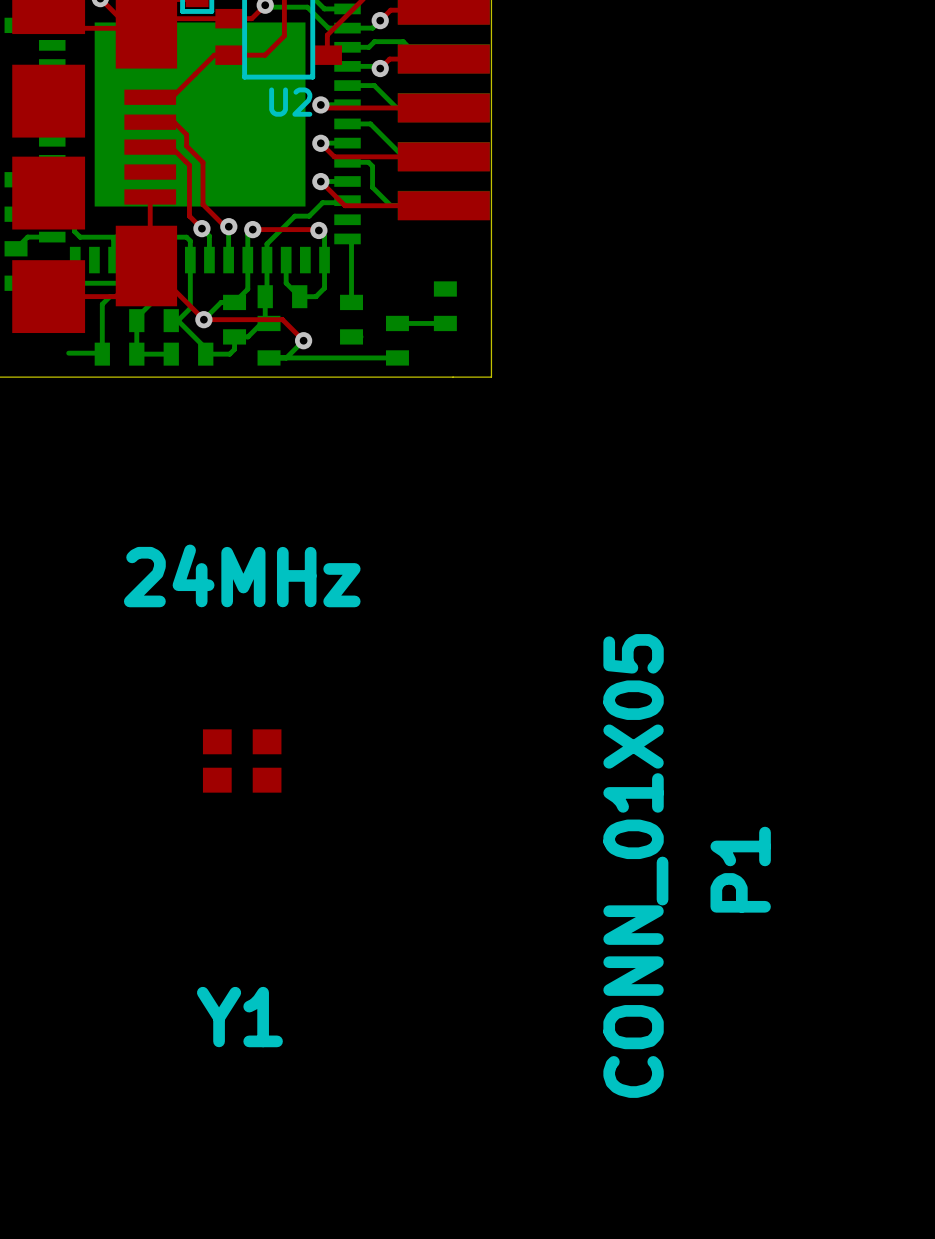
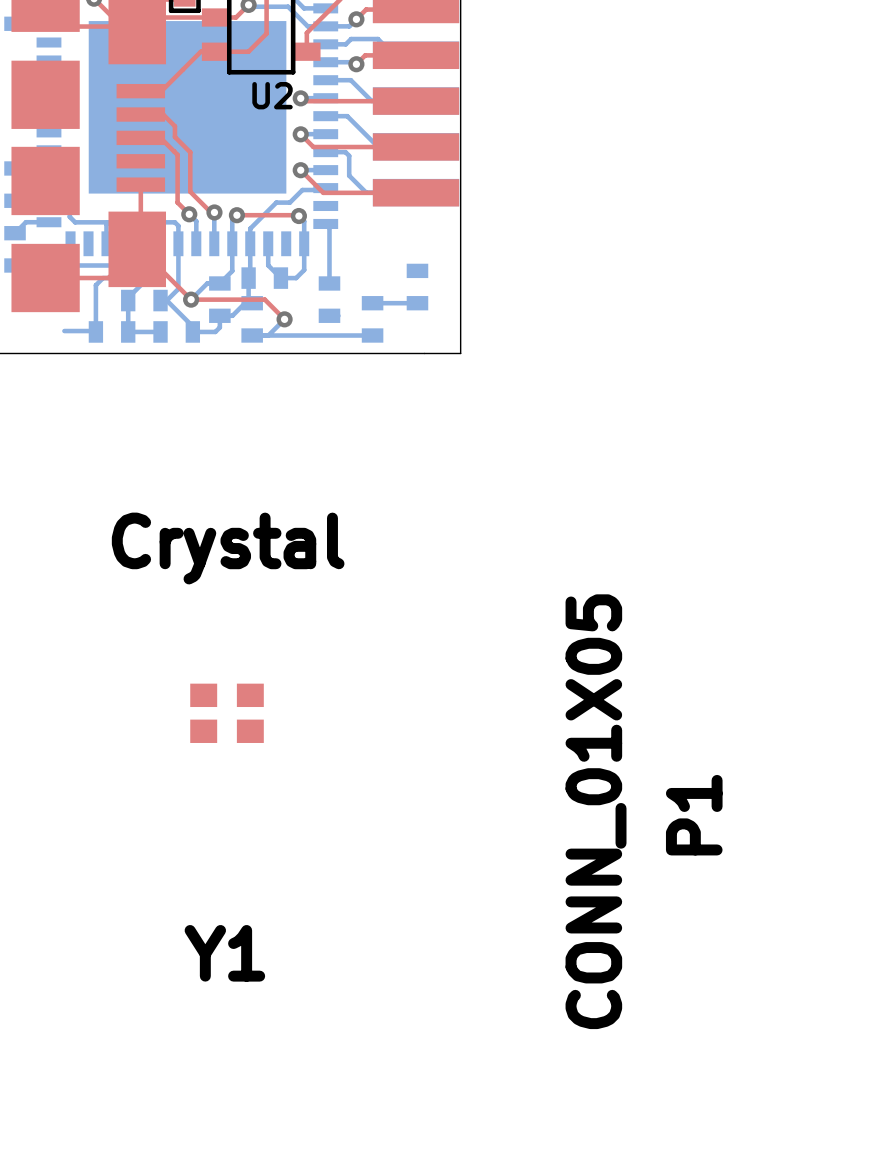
Y1 value: 24MHz (242, 575) -> Crystal (228, 548)

